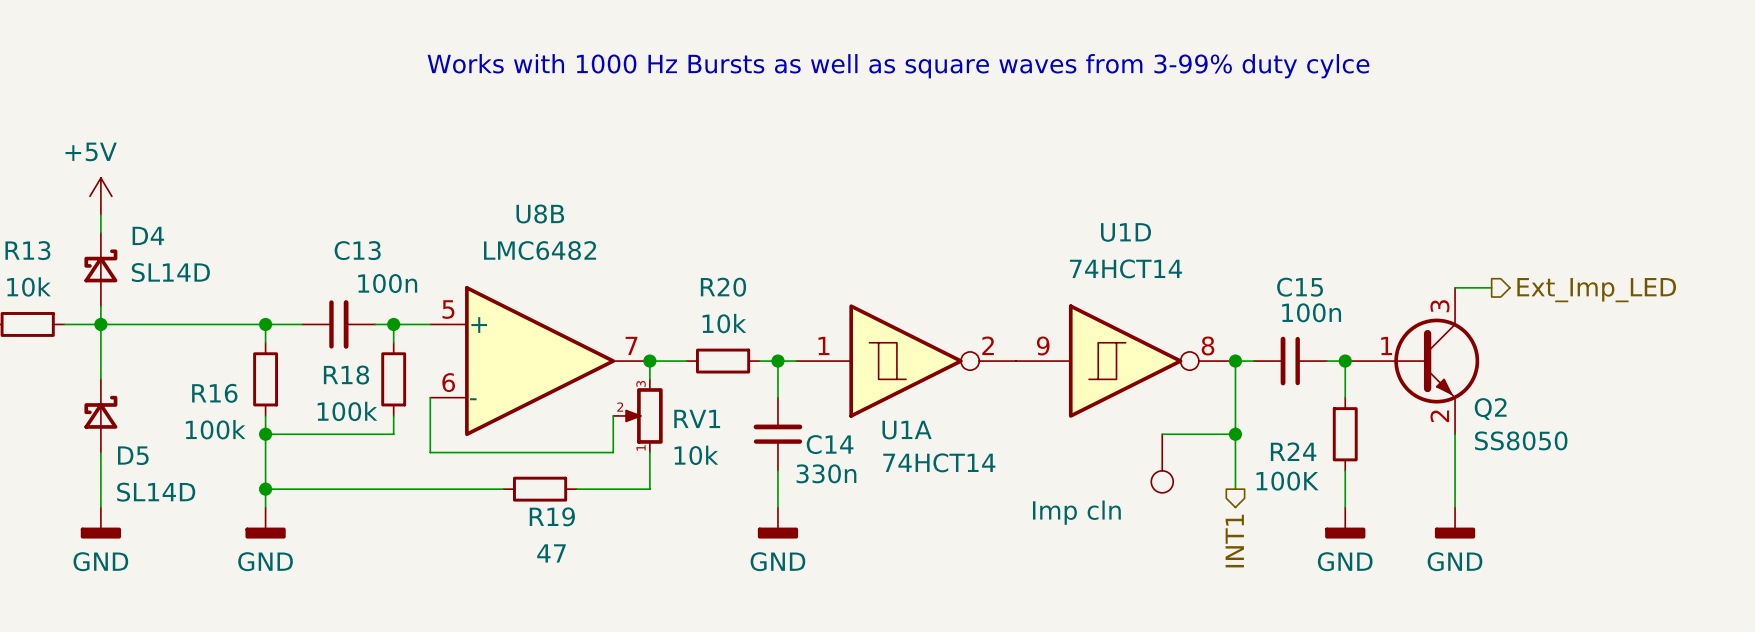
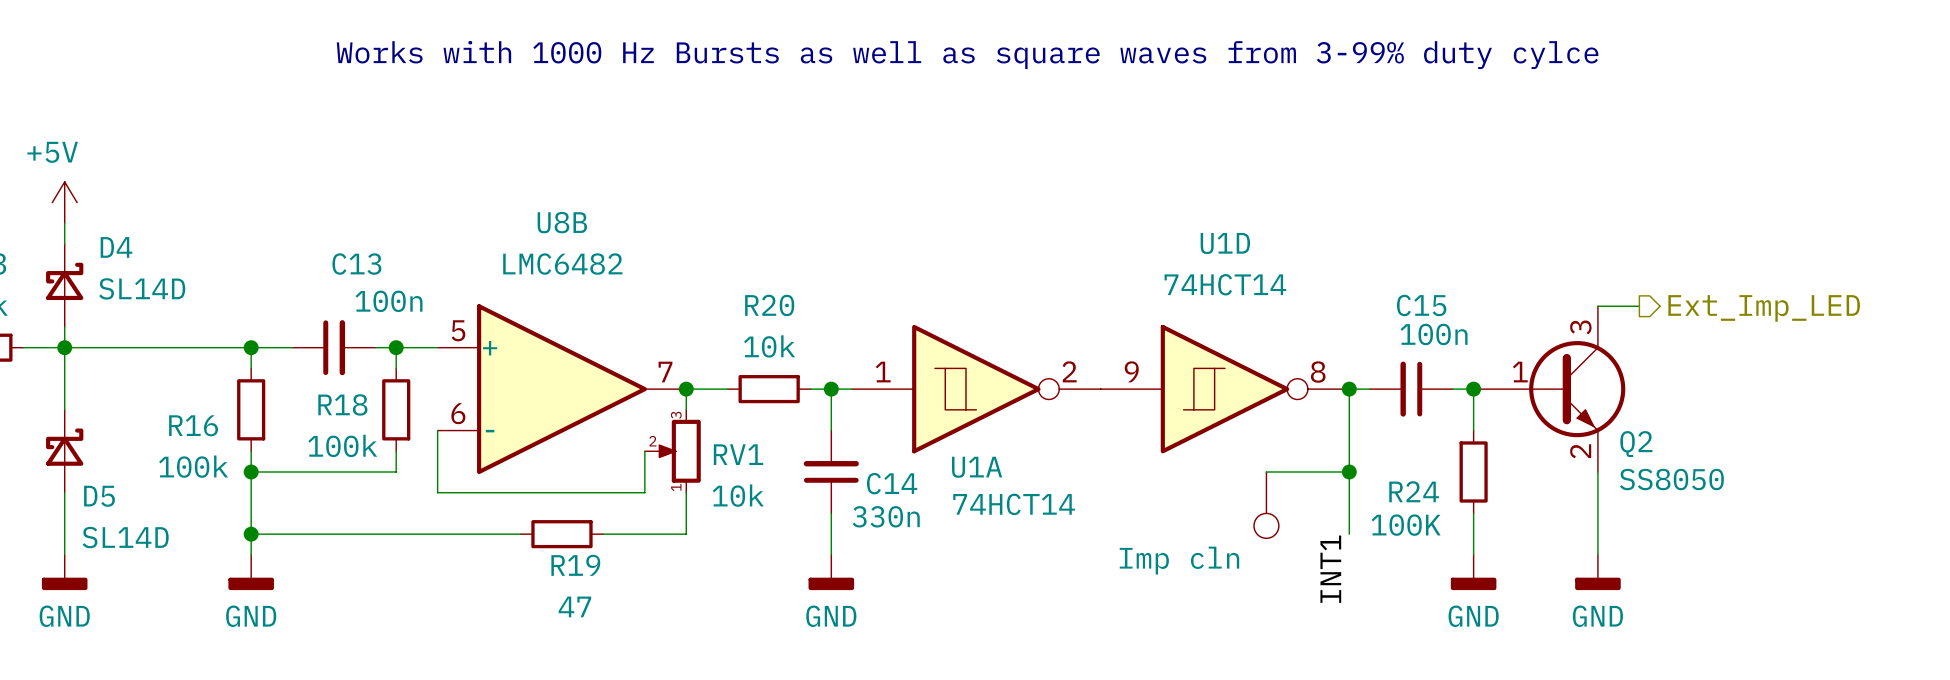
label: none -> INT1 (1330, 569)
hierarchical label: INT1 (1234, 541) -> none

